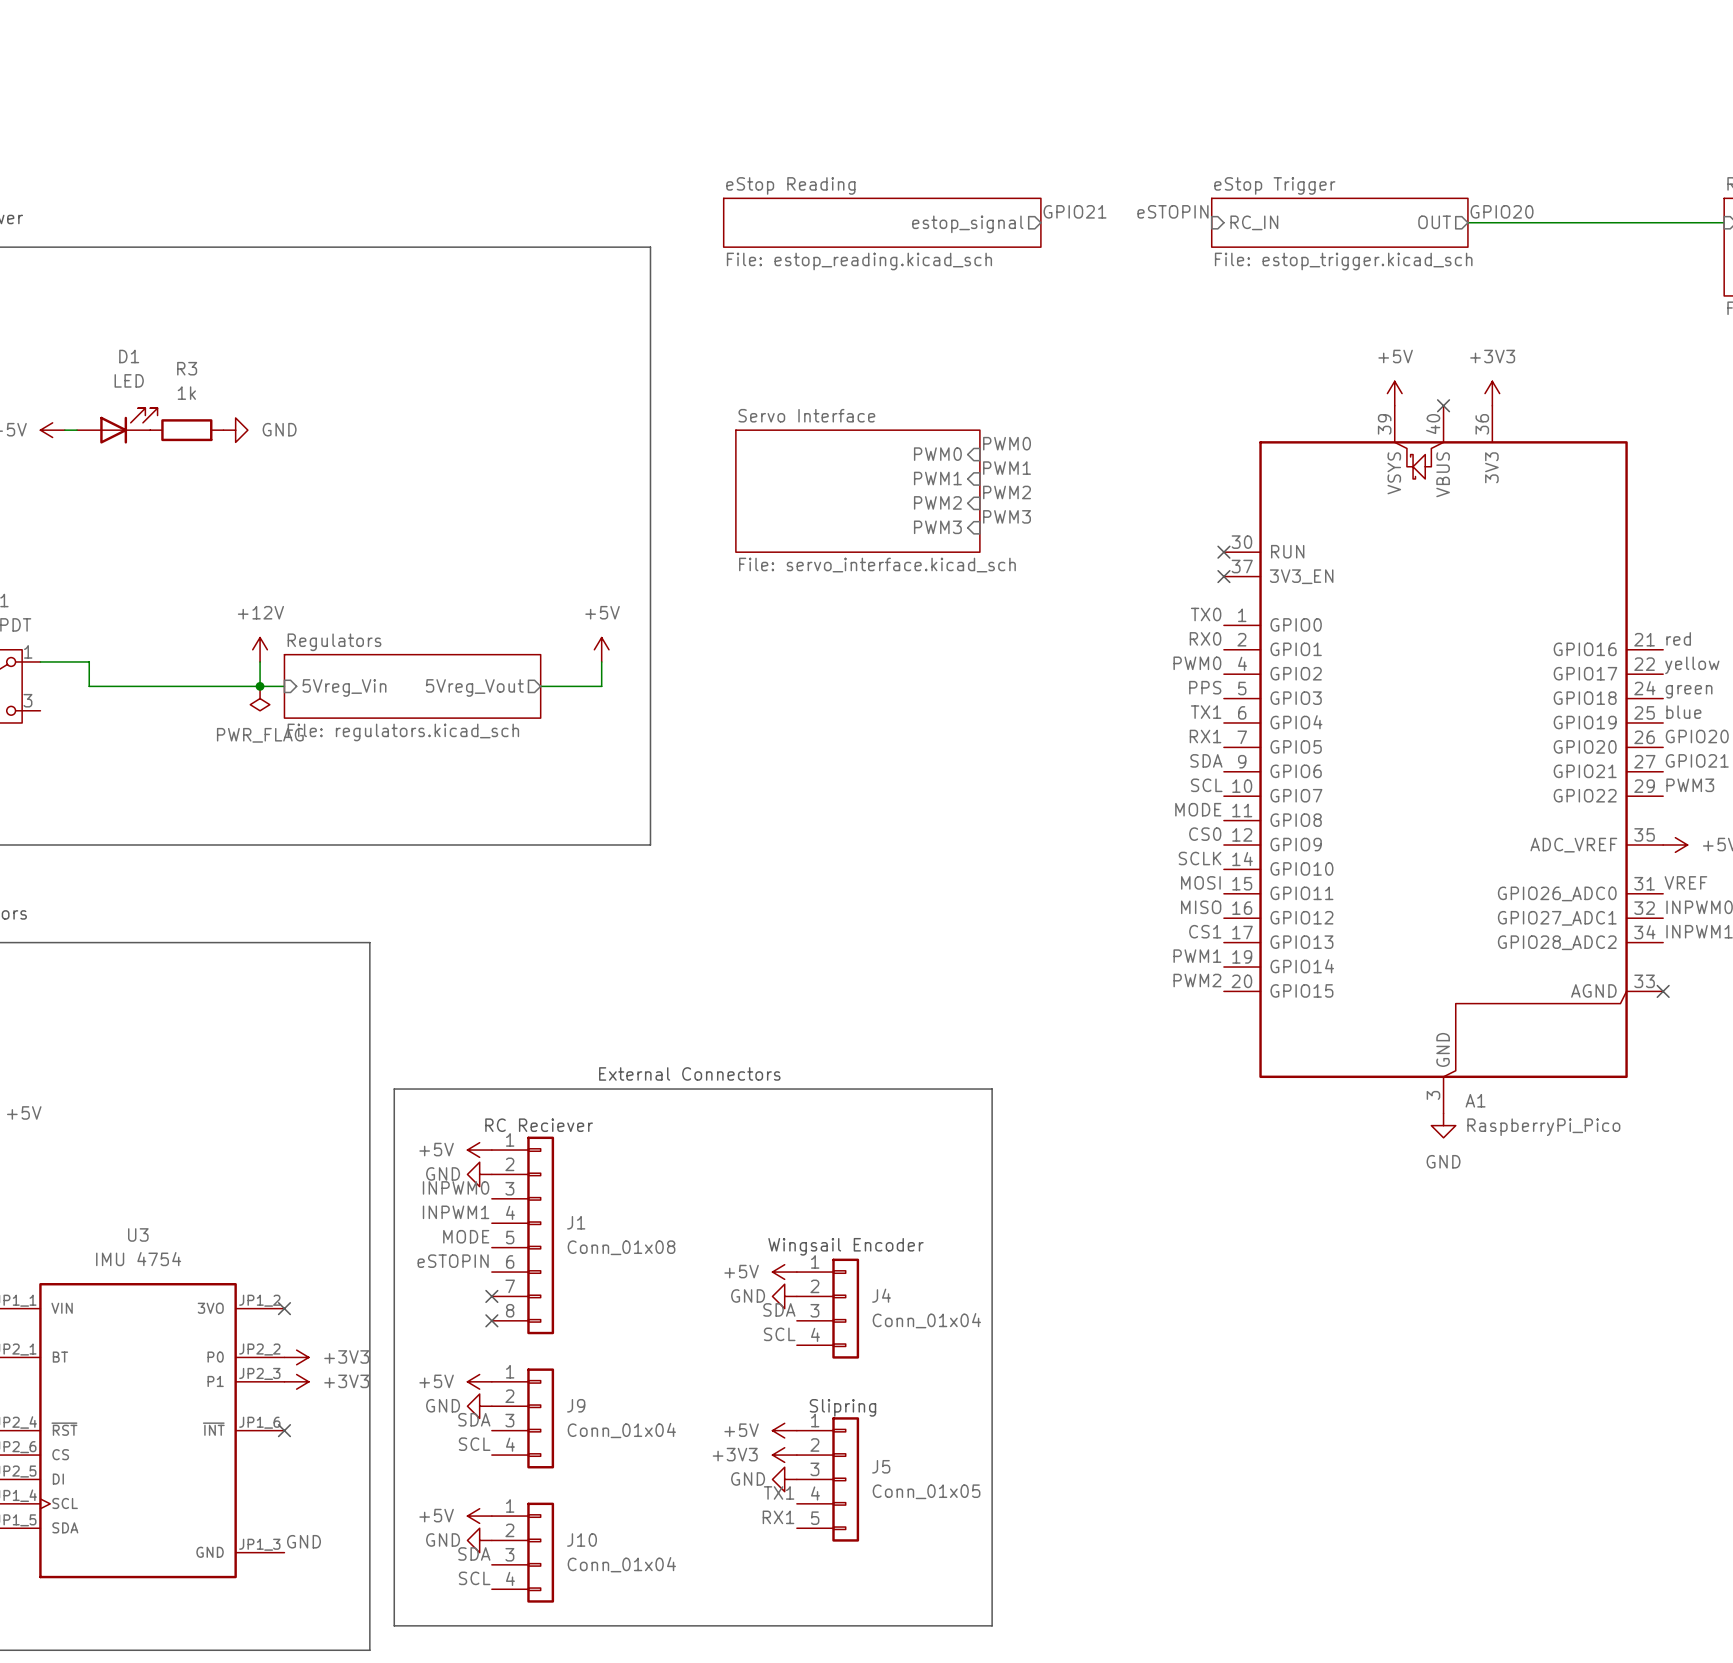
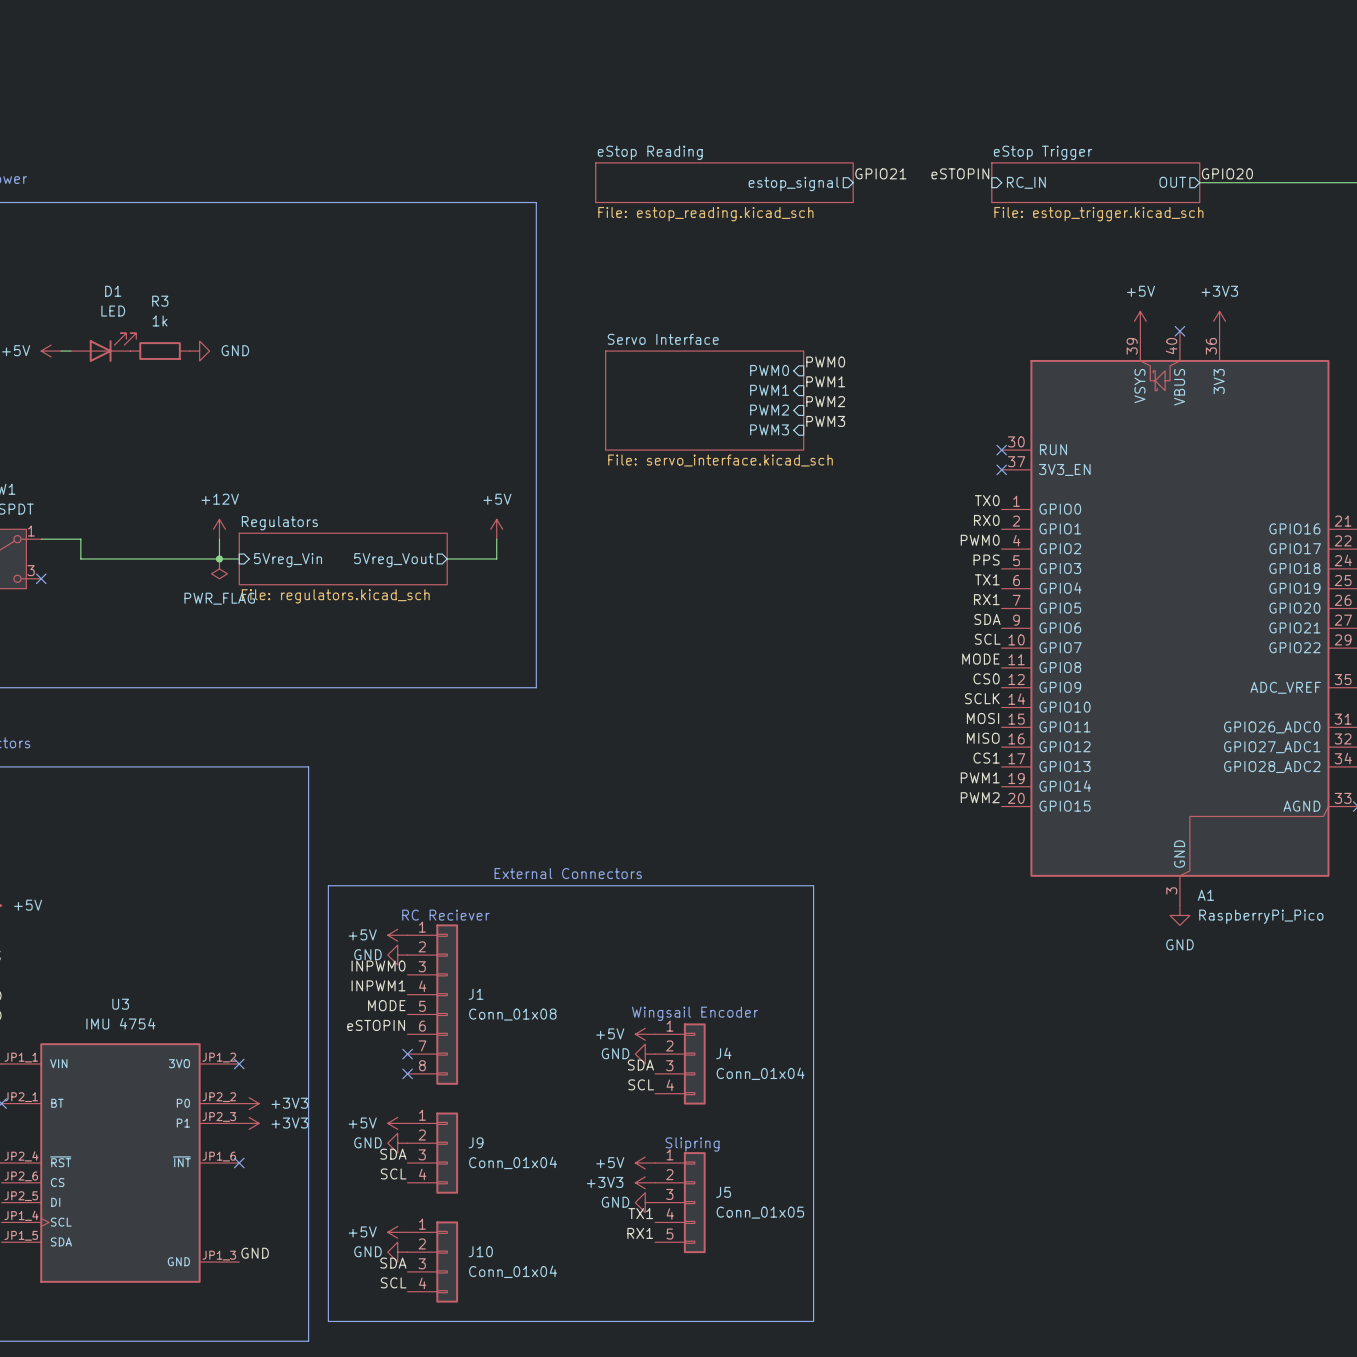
no-connect mark: none -> (41, 578)

